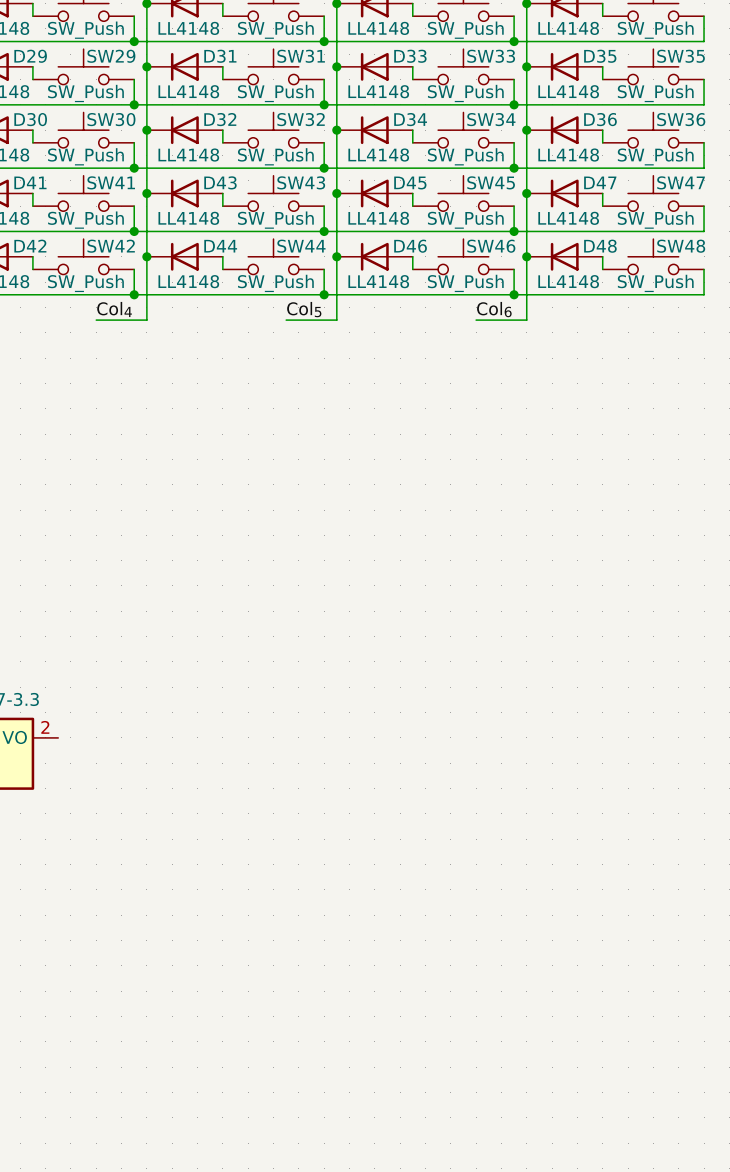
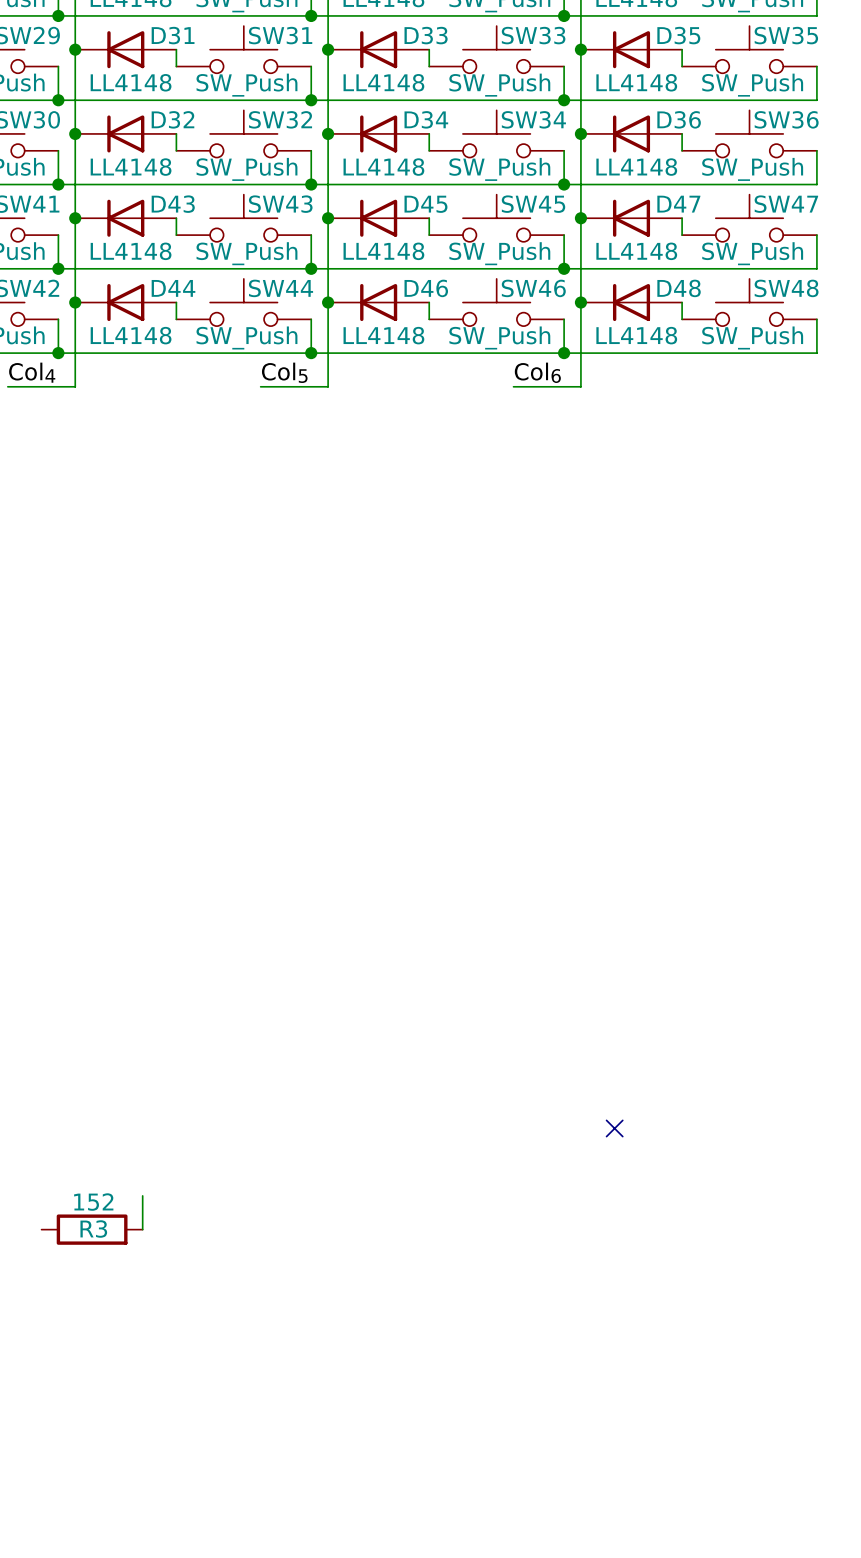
no-connect mark: none -> (614, 1128)
wire: none -> (142, 1195) (142, 1229)
R3: none -> 152 (92, 1229)

